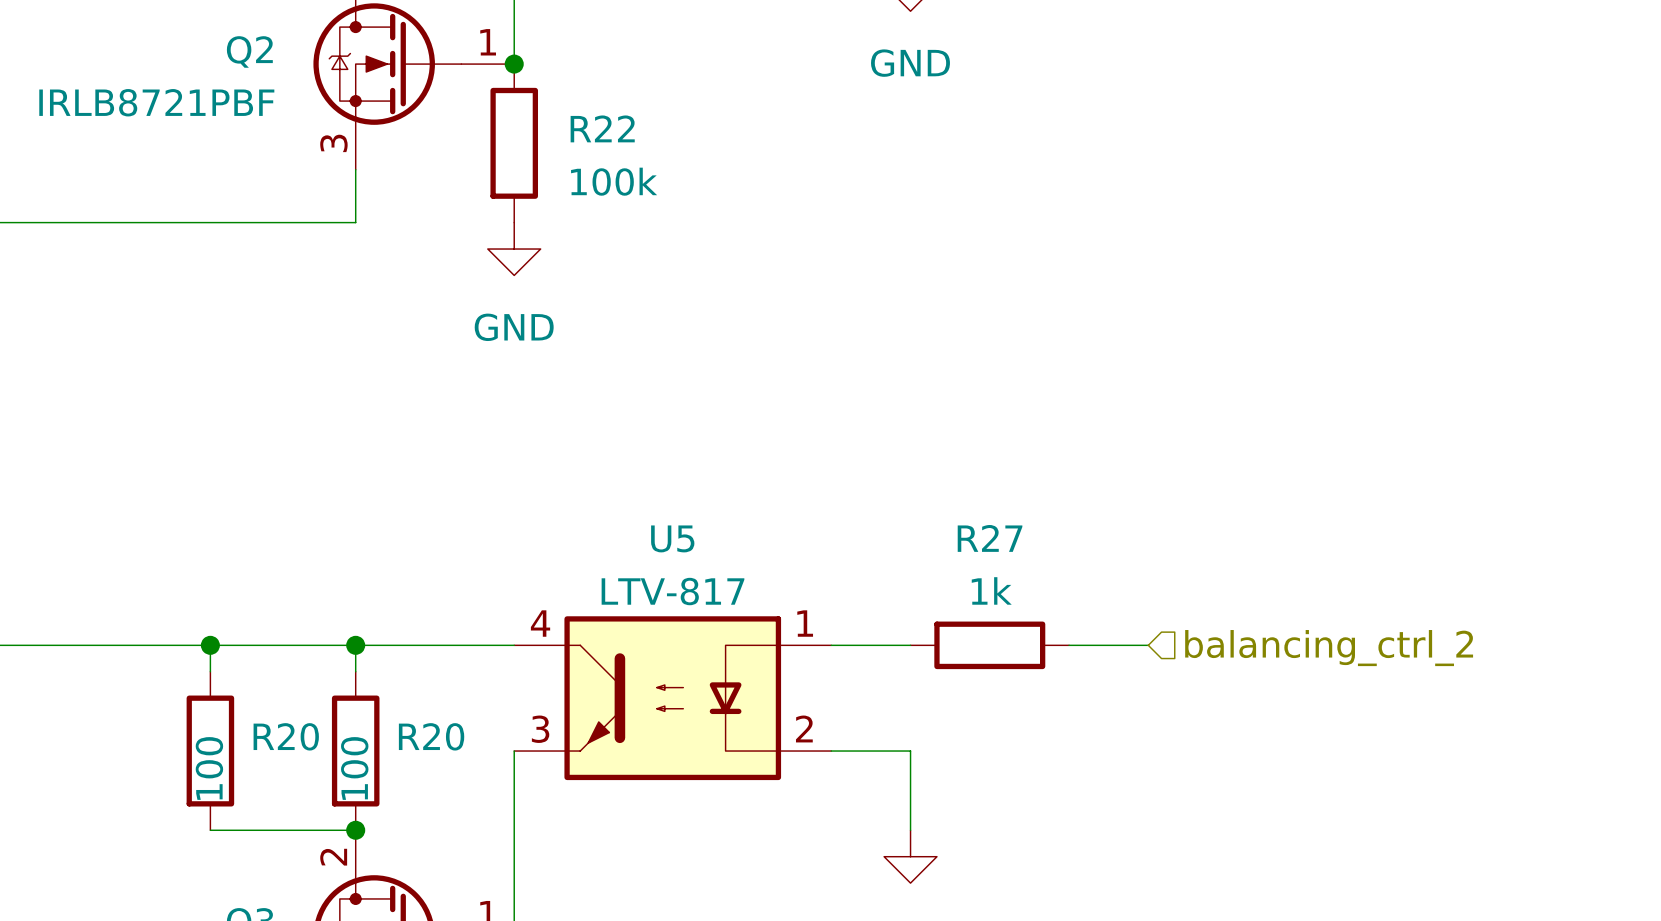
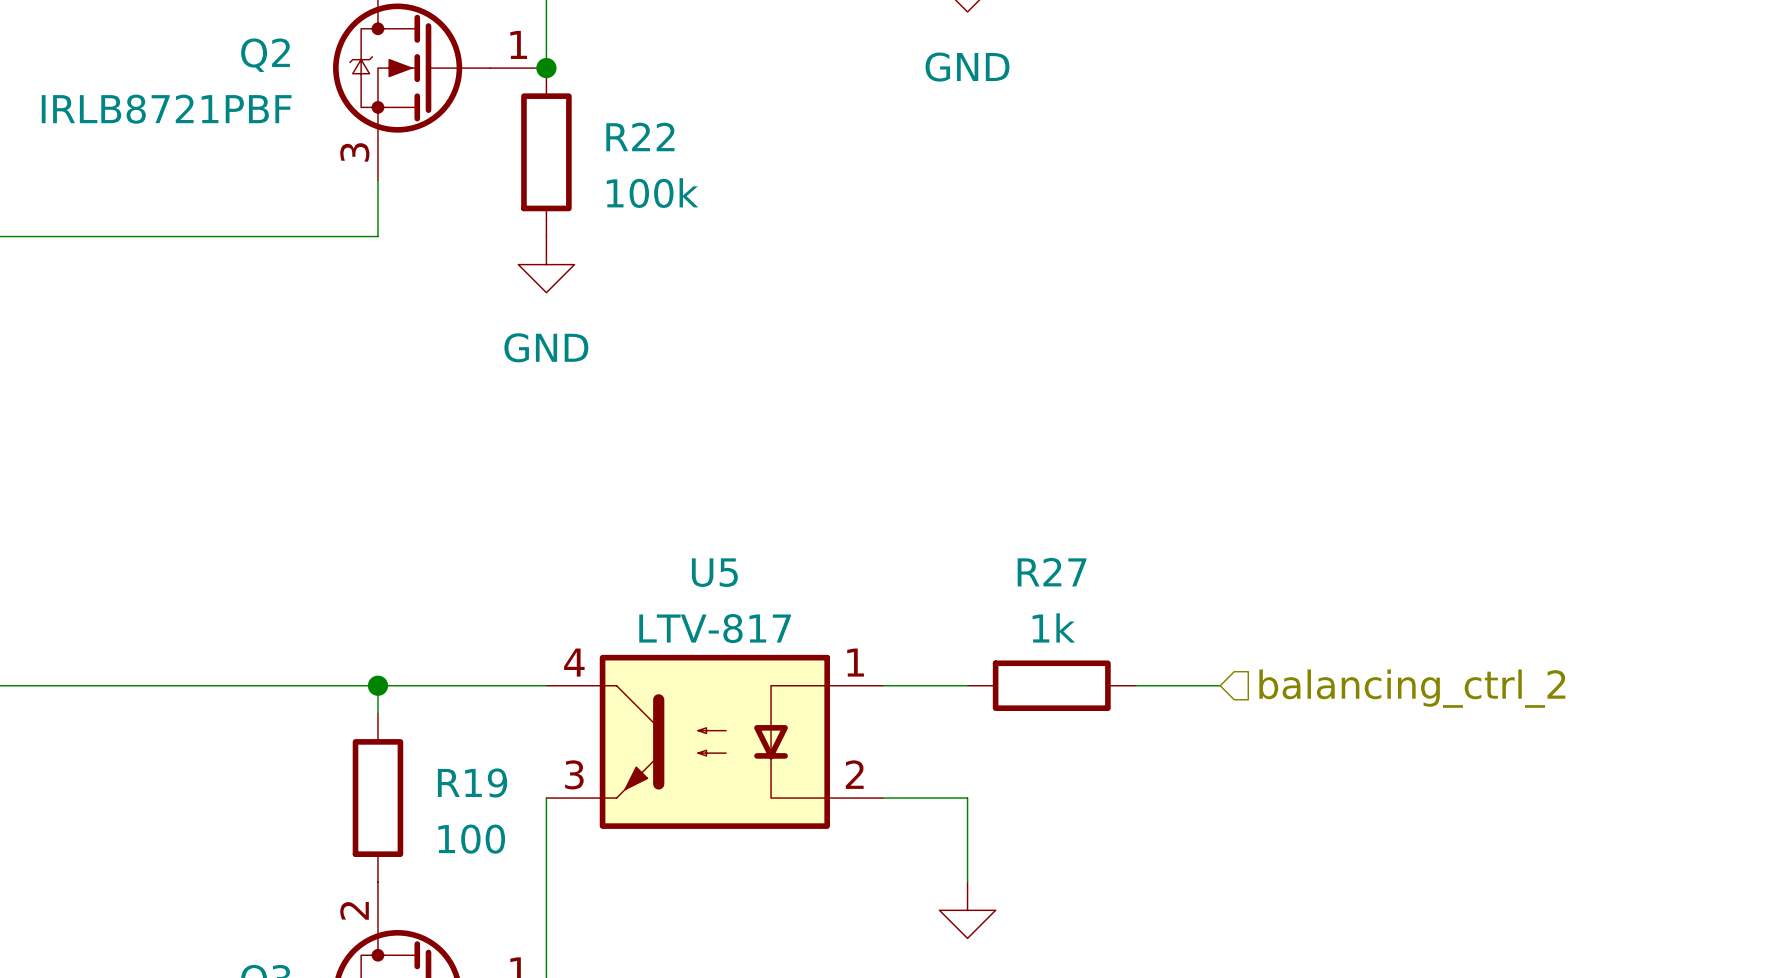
wire: (210, 645) (210, 671) -> none
junction: (210, 645) -> none
R20 name: R20 (431, 736) -> R19 (472, 782)
R20: 100 (210, 751) -> none
R20 value rotation: 0° (354, 768) -> 90° clockwise (471, 839)
R20 value position: 100 (354, 768) -> 100 (471, 839)
wire: (210, 830) (355, 830) -> none
junction: (355, 830) -> none

